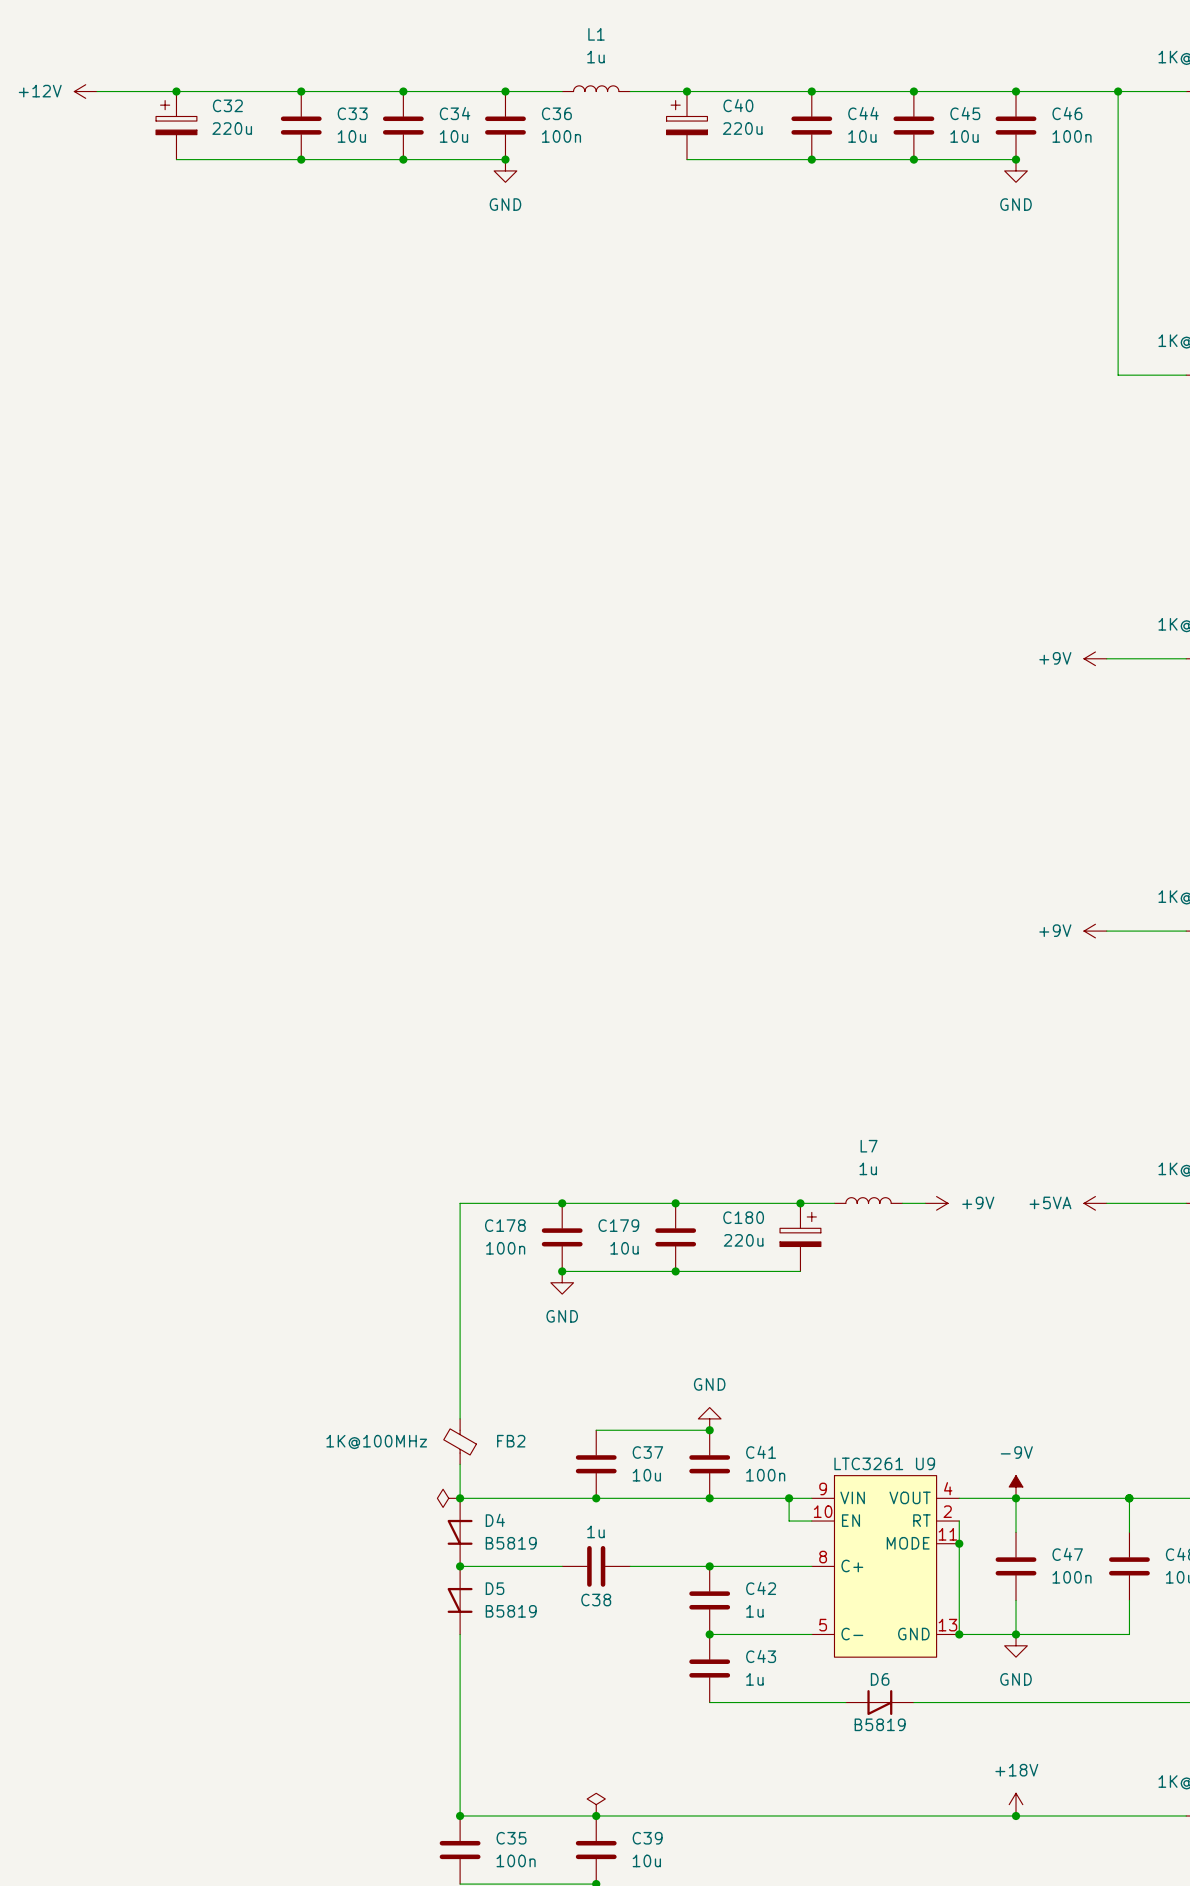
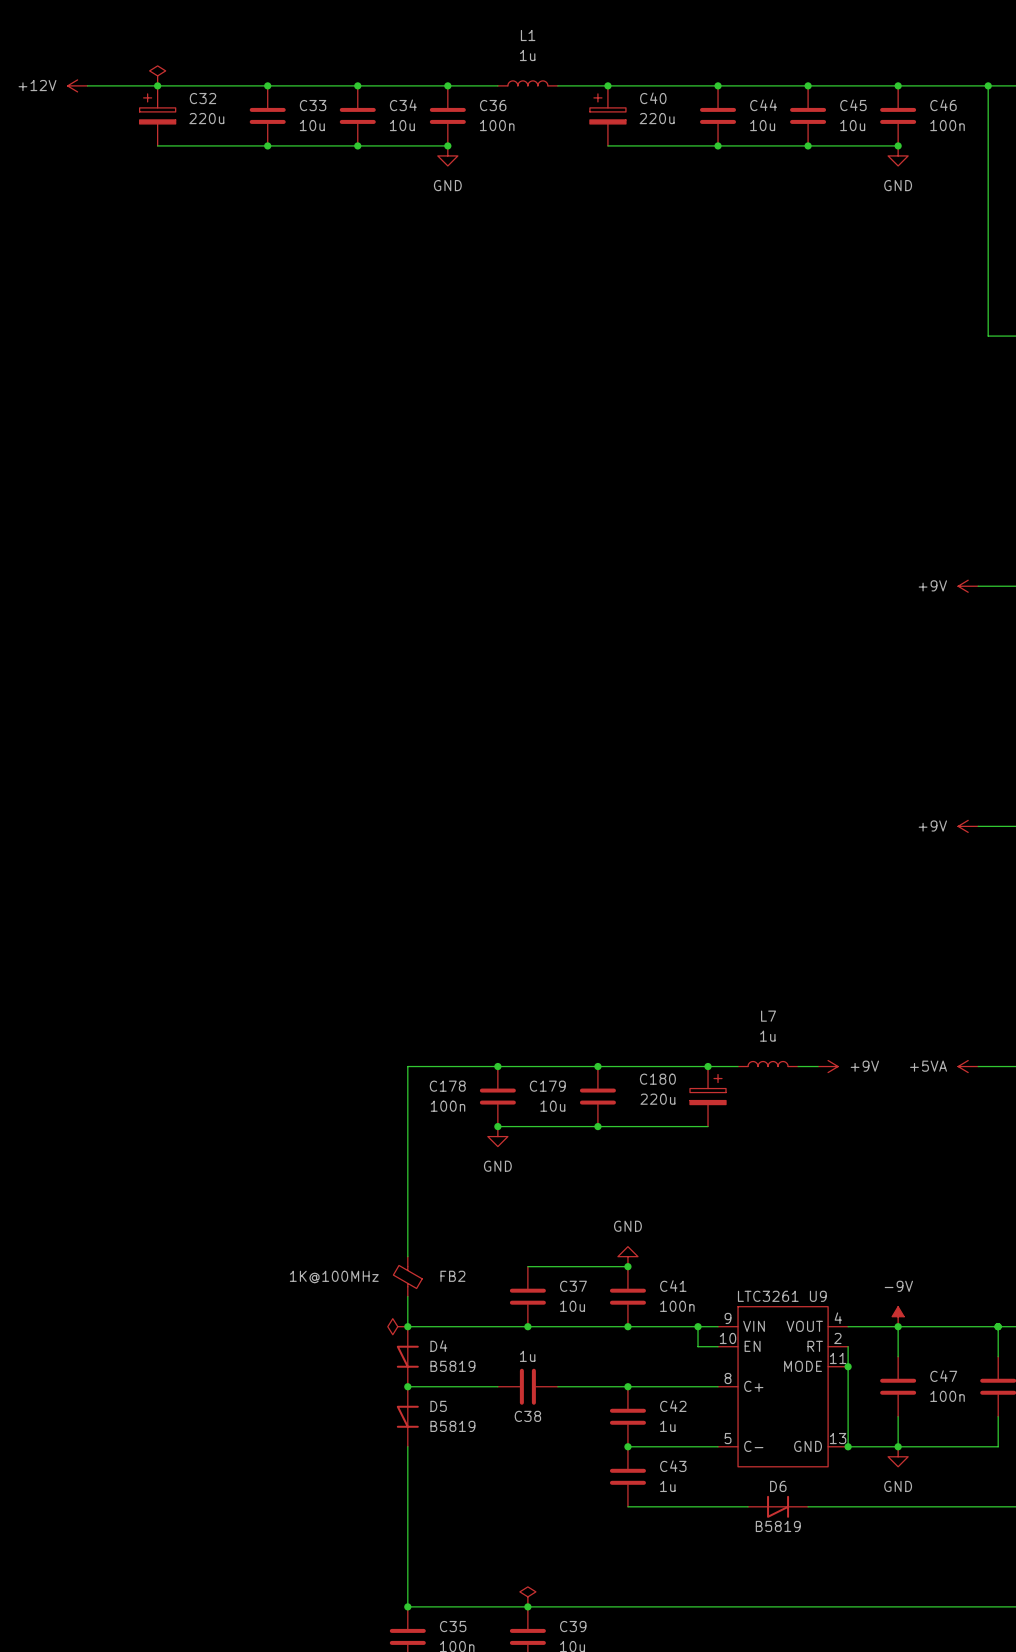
power symbol: none -> (157, 75)
power symbol: +18V (1016, 1804) -> none
junction: (1016, 1815) -> none

